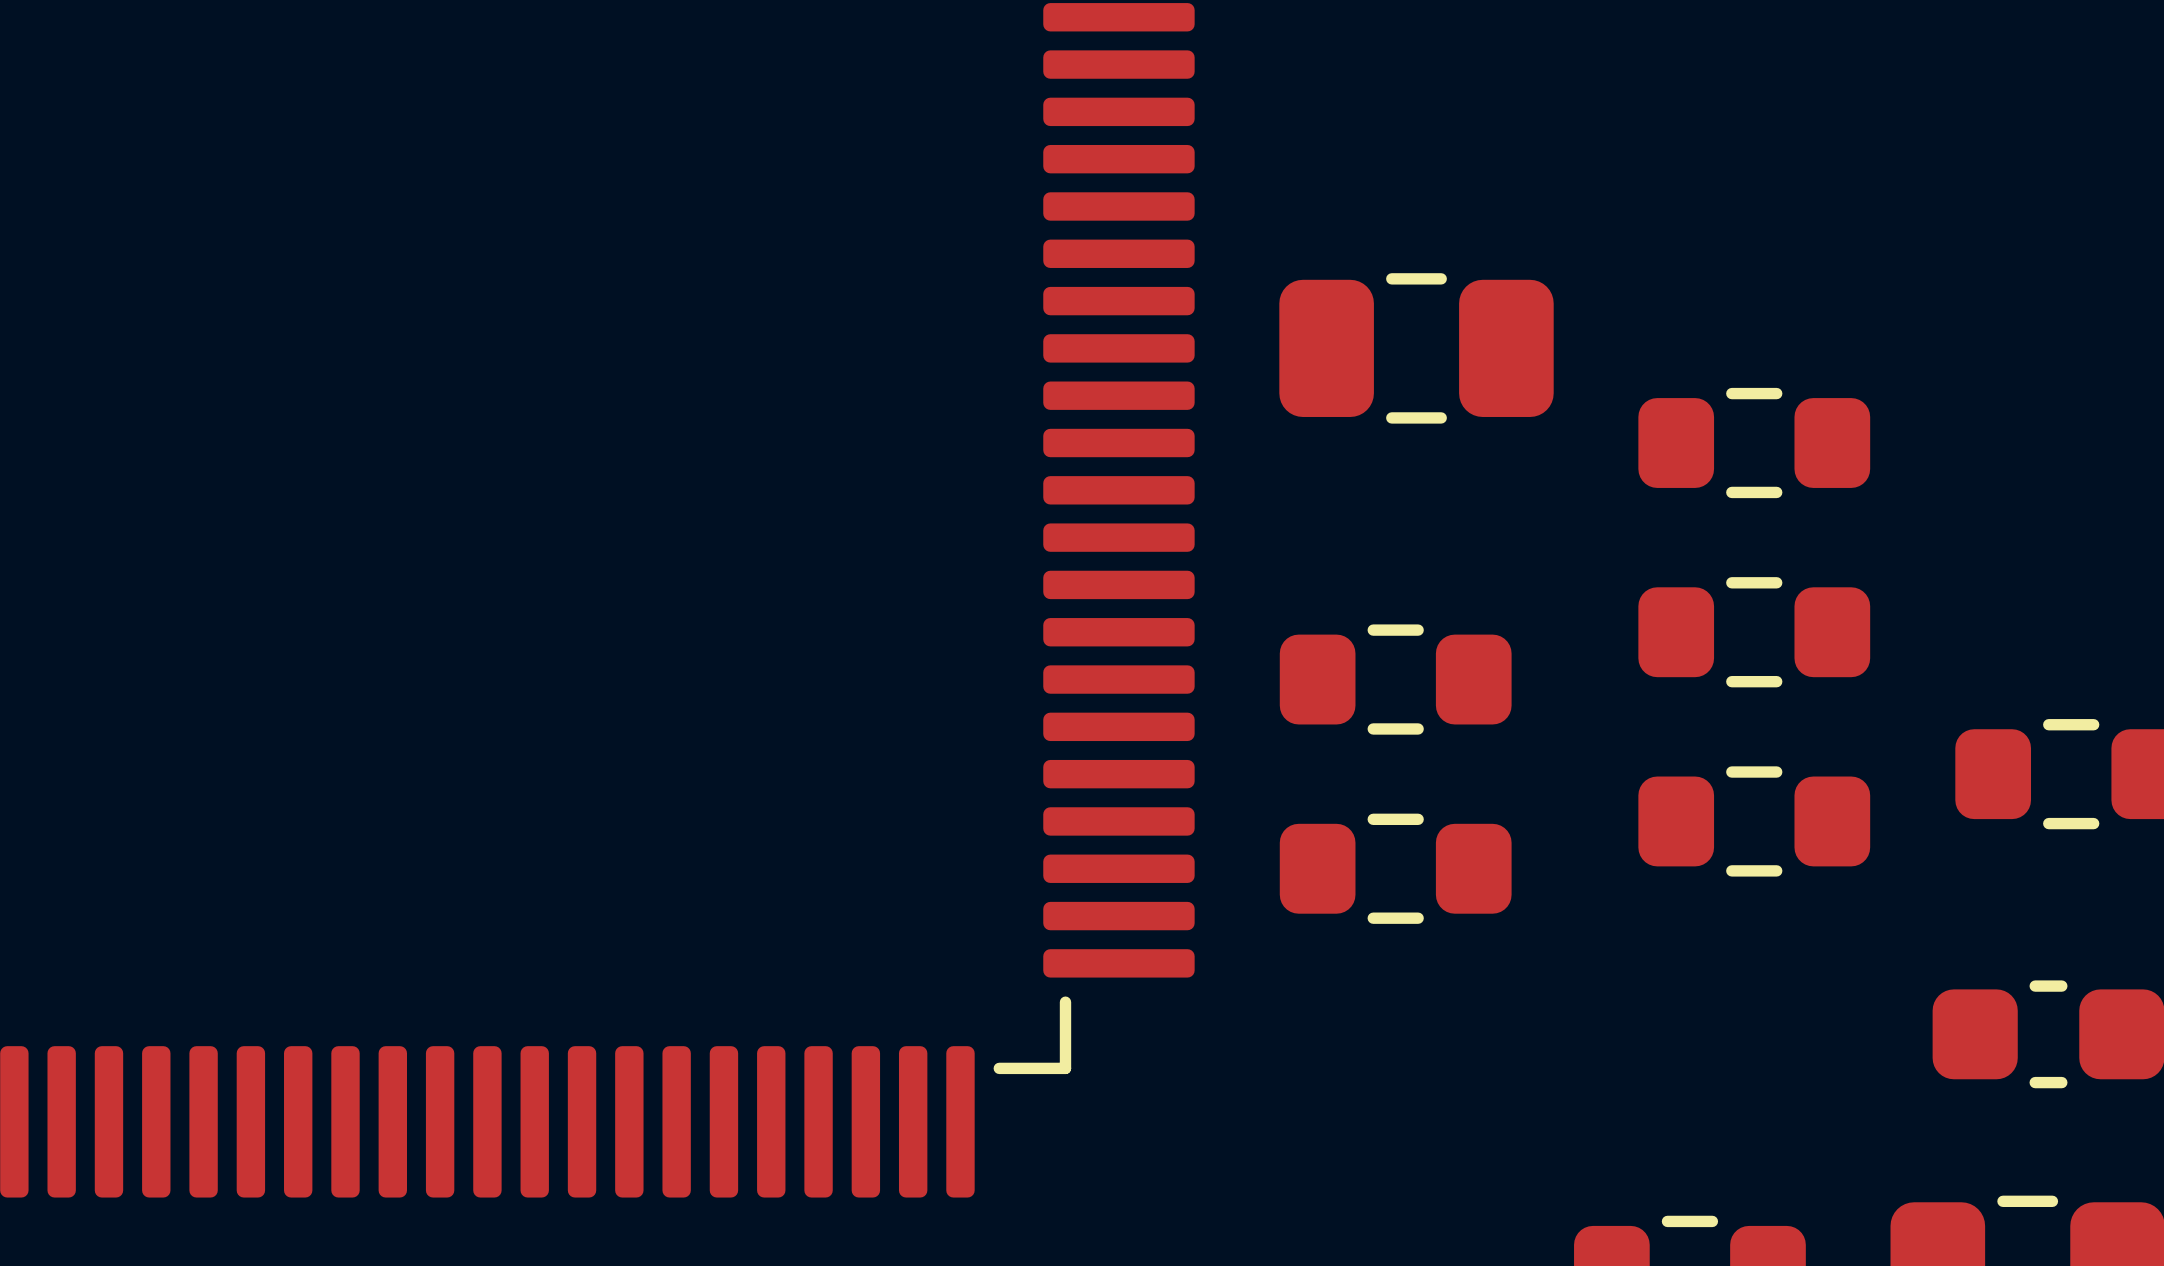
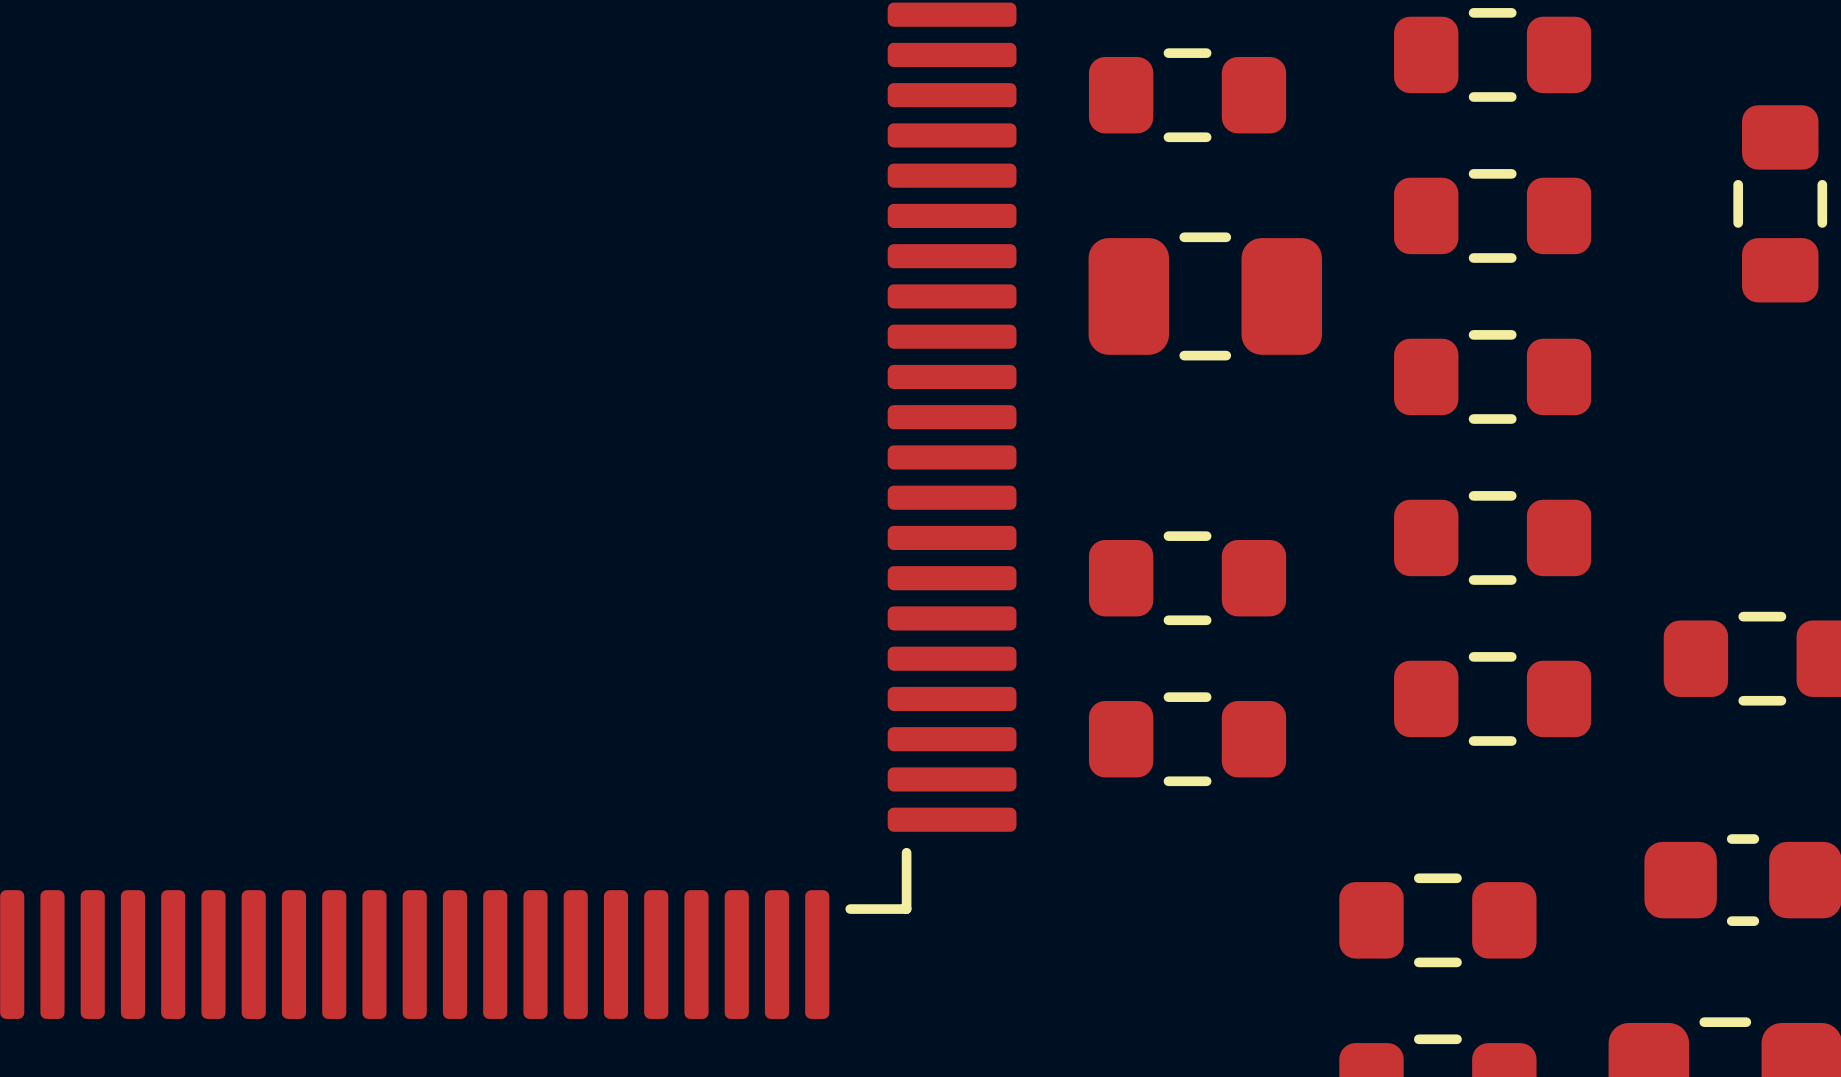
part: none -> (1492, 54)
part: none -> (1187, 95)
part: none -> (1780, 203)
part: none -> (1492, 215)
part: none -> (1437, 920)

